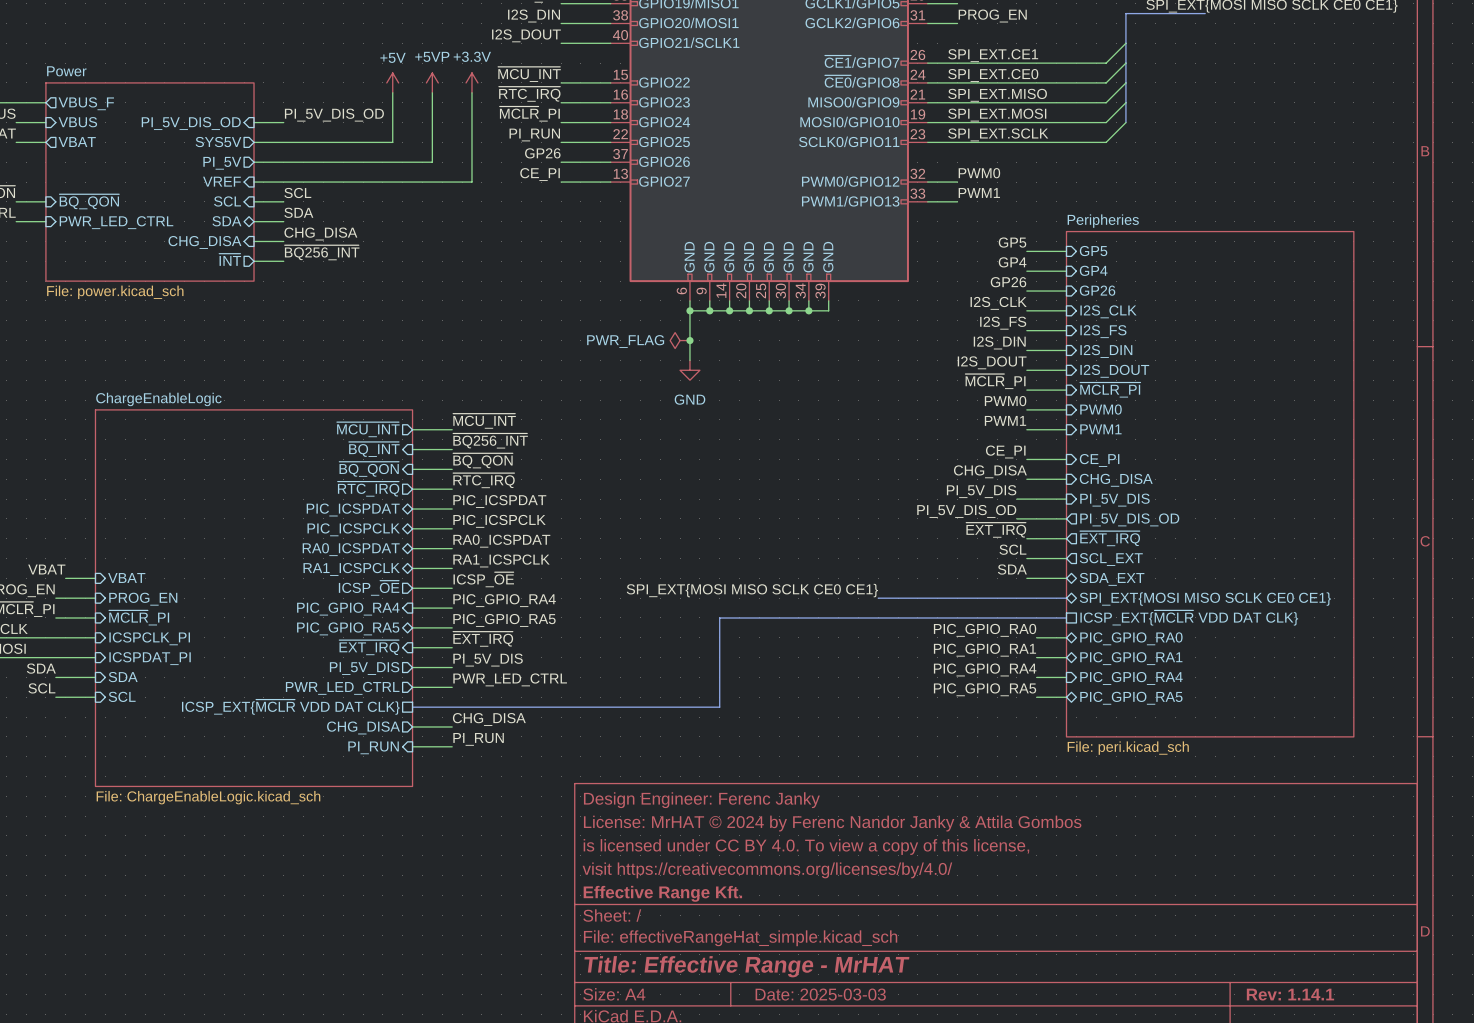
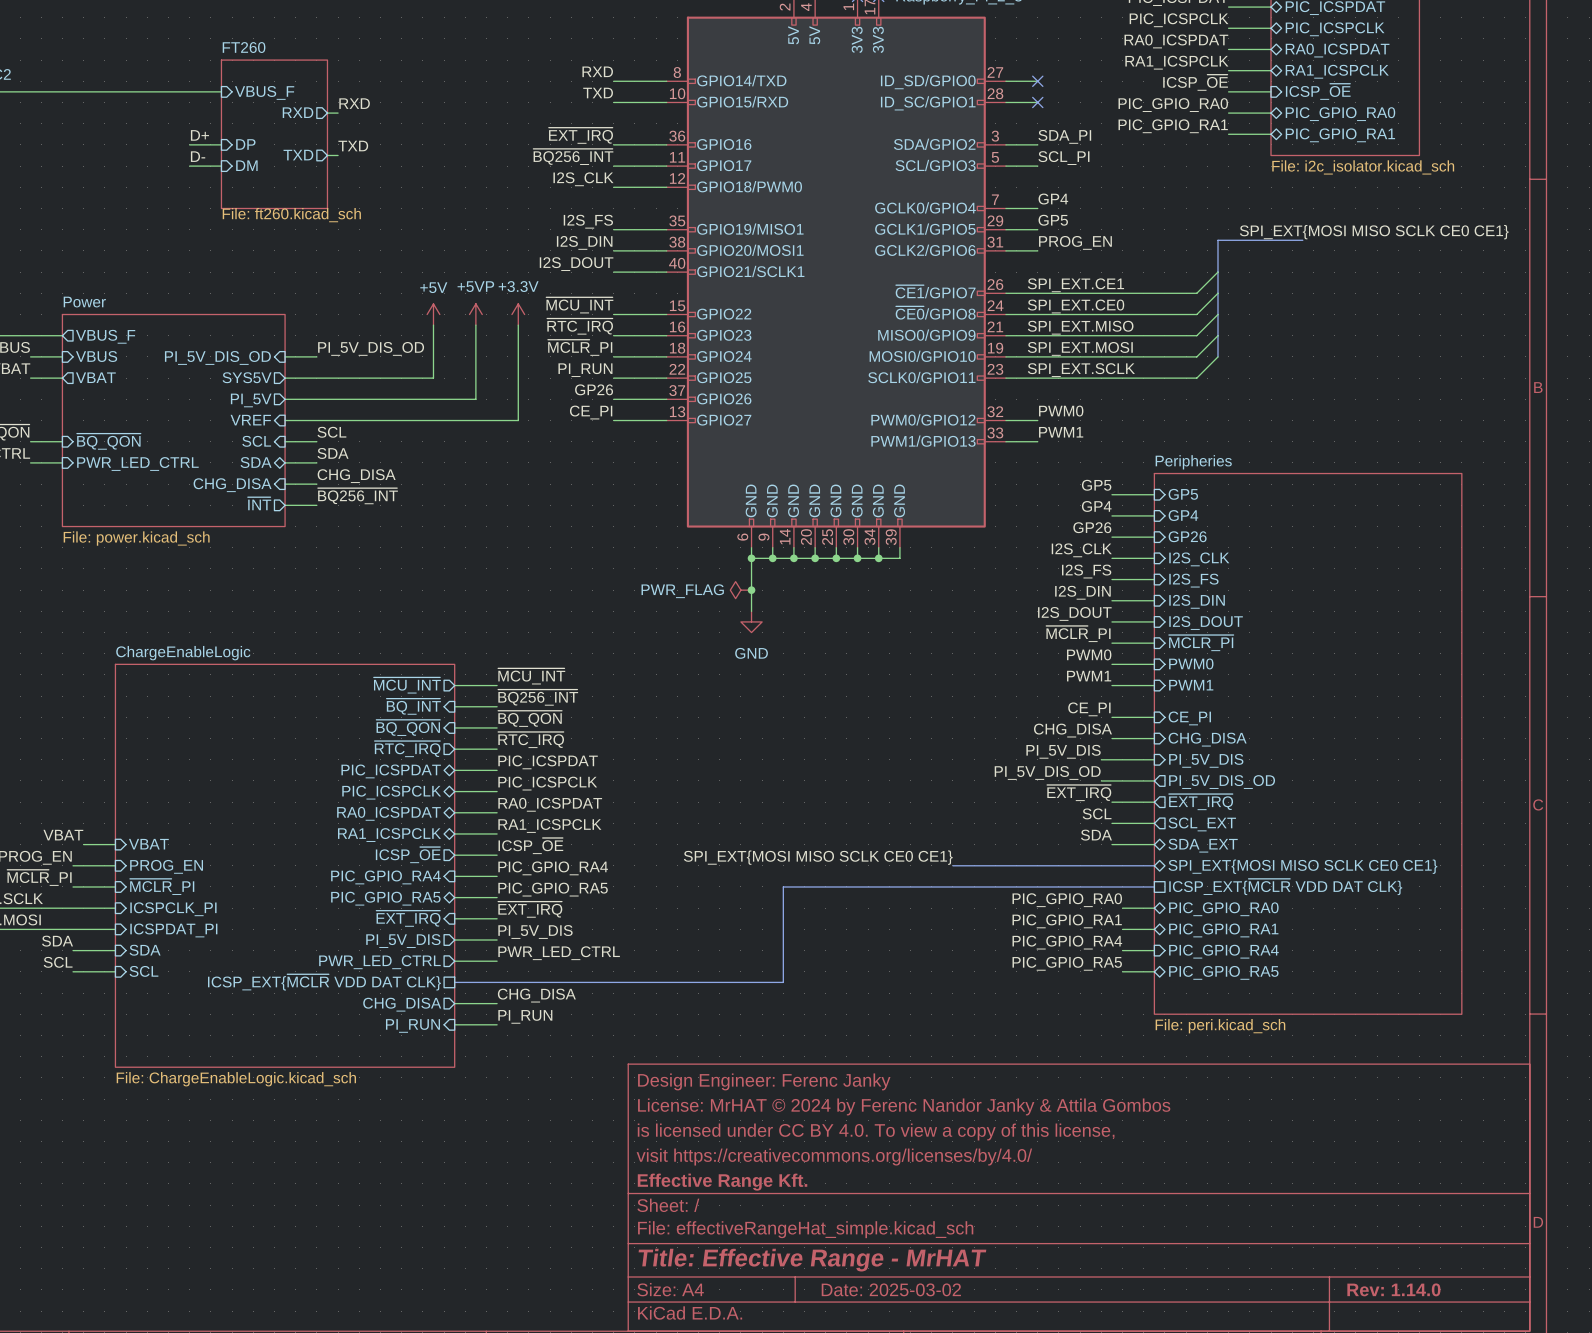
title block: Date: 2025-03-03 (820, 994) -> Date: 2025-03-02 (891, 1289)
title block: Rev: 1.14.1 (1290, 994) -> Rev: 1.14.0 (1393, 1289)

